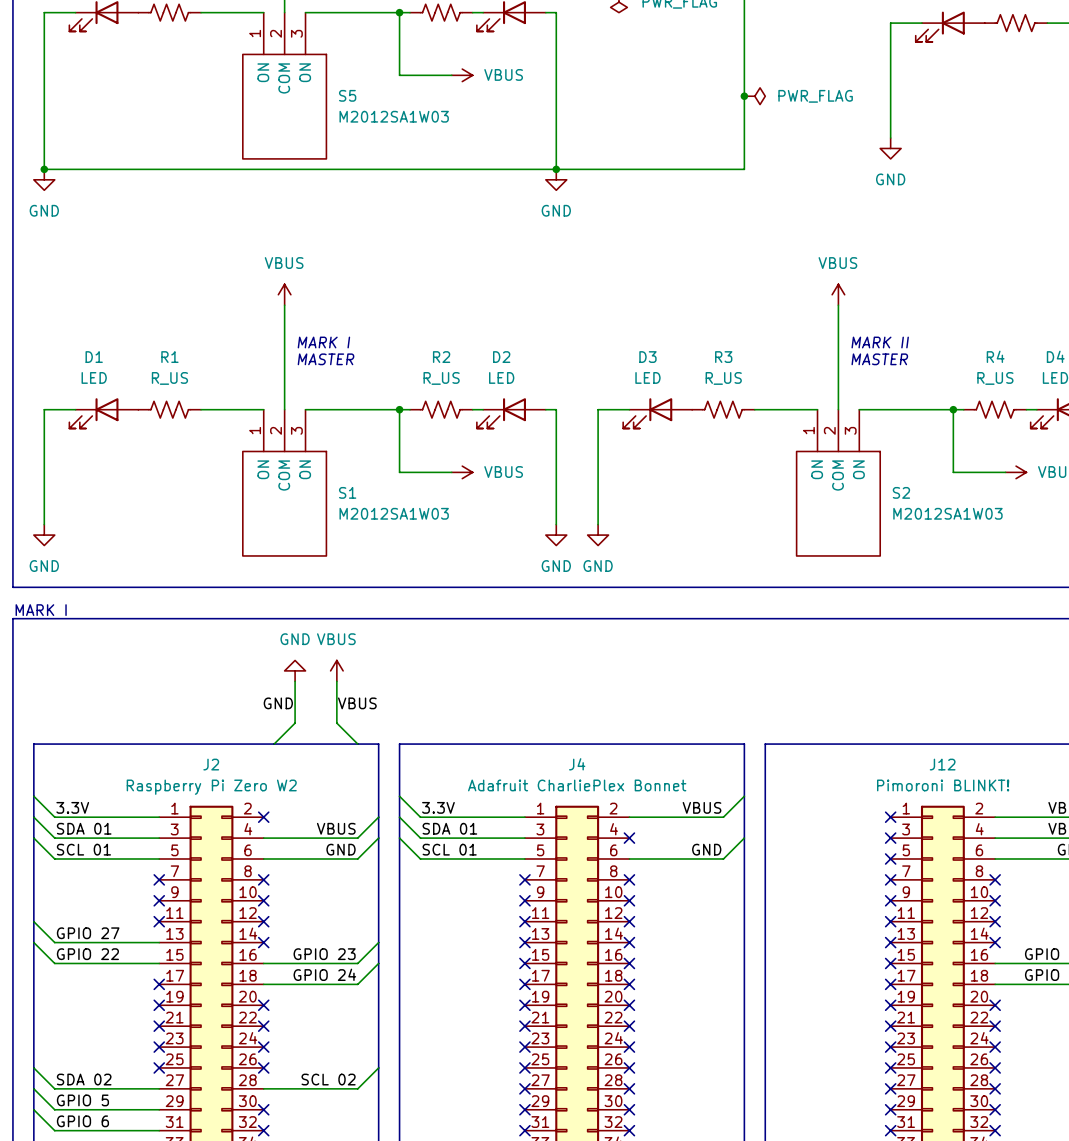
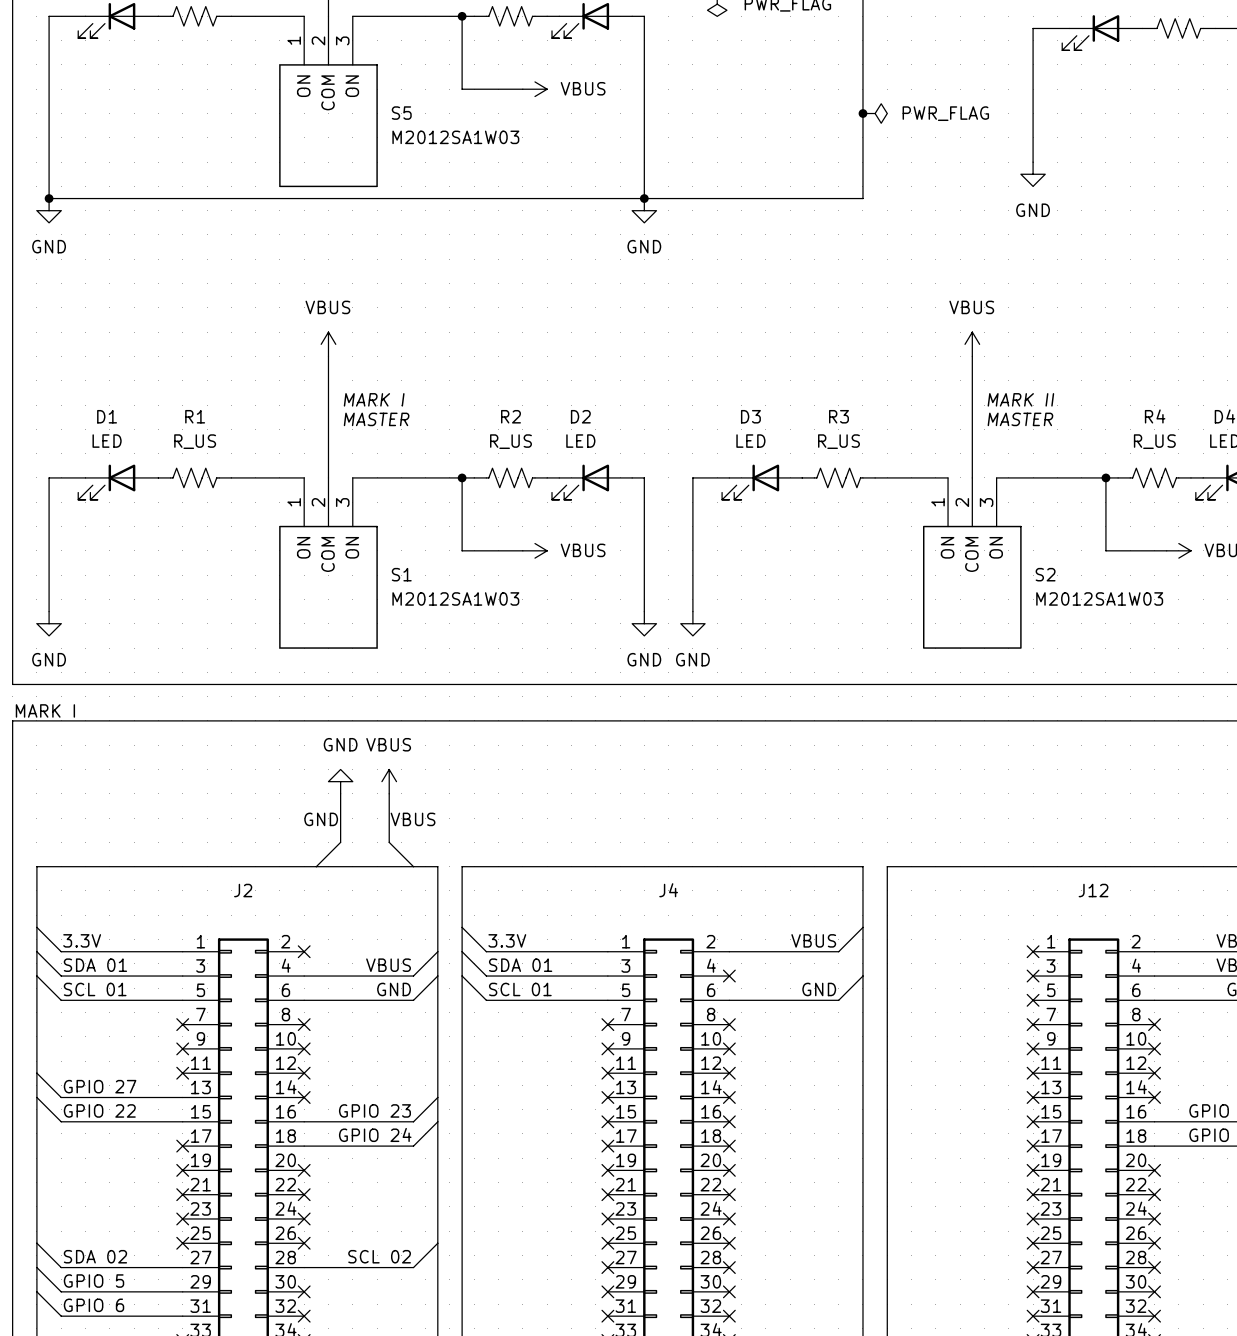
J4 value: Adafruit CharliePlex Bonnet (577, 785) -> none
J12 value: Pimoroni BLINKT! (943, 785) -> none
J2 value: Raspberry Pi Zero W2 (211, 787) -> none

